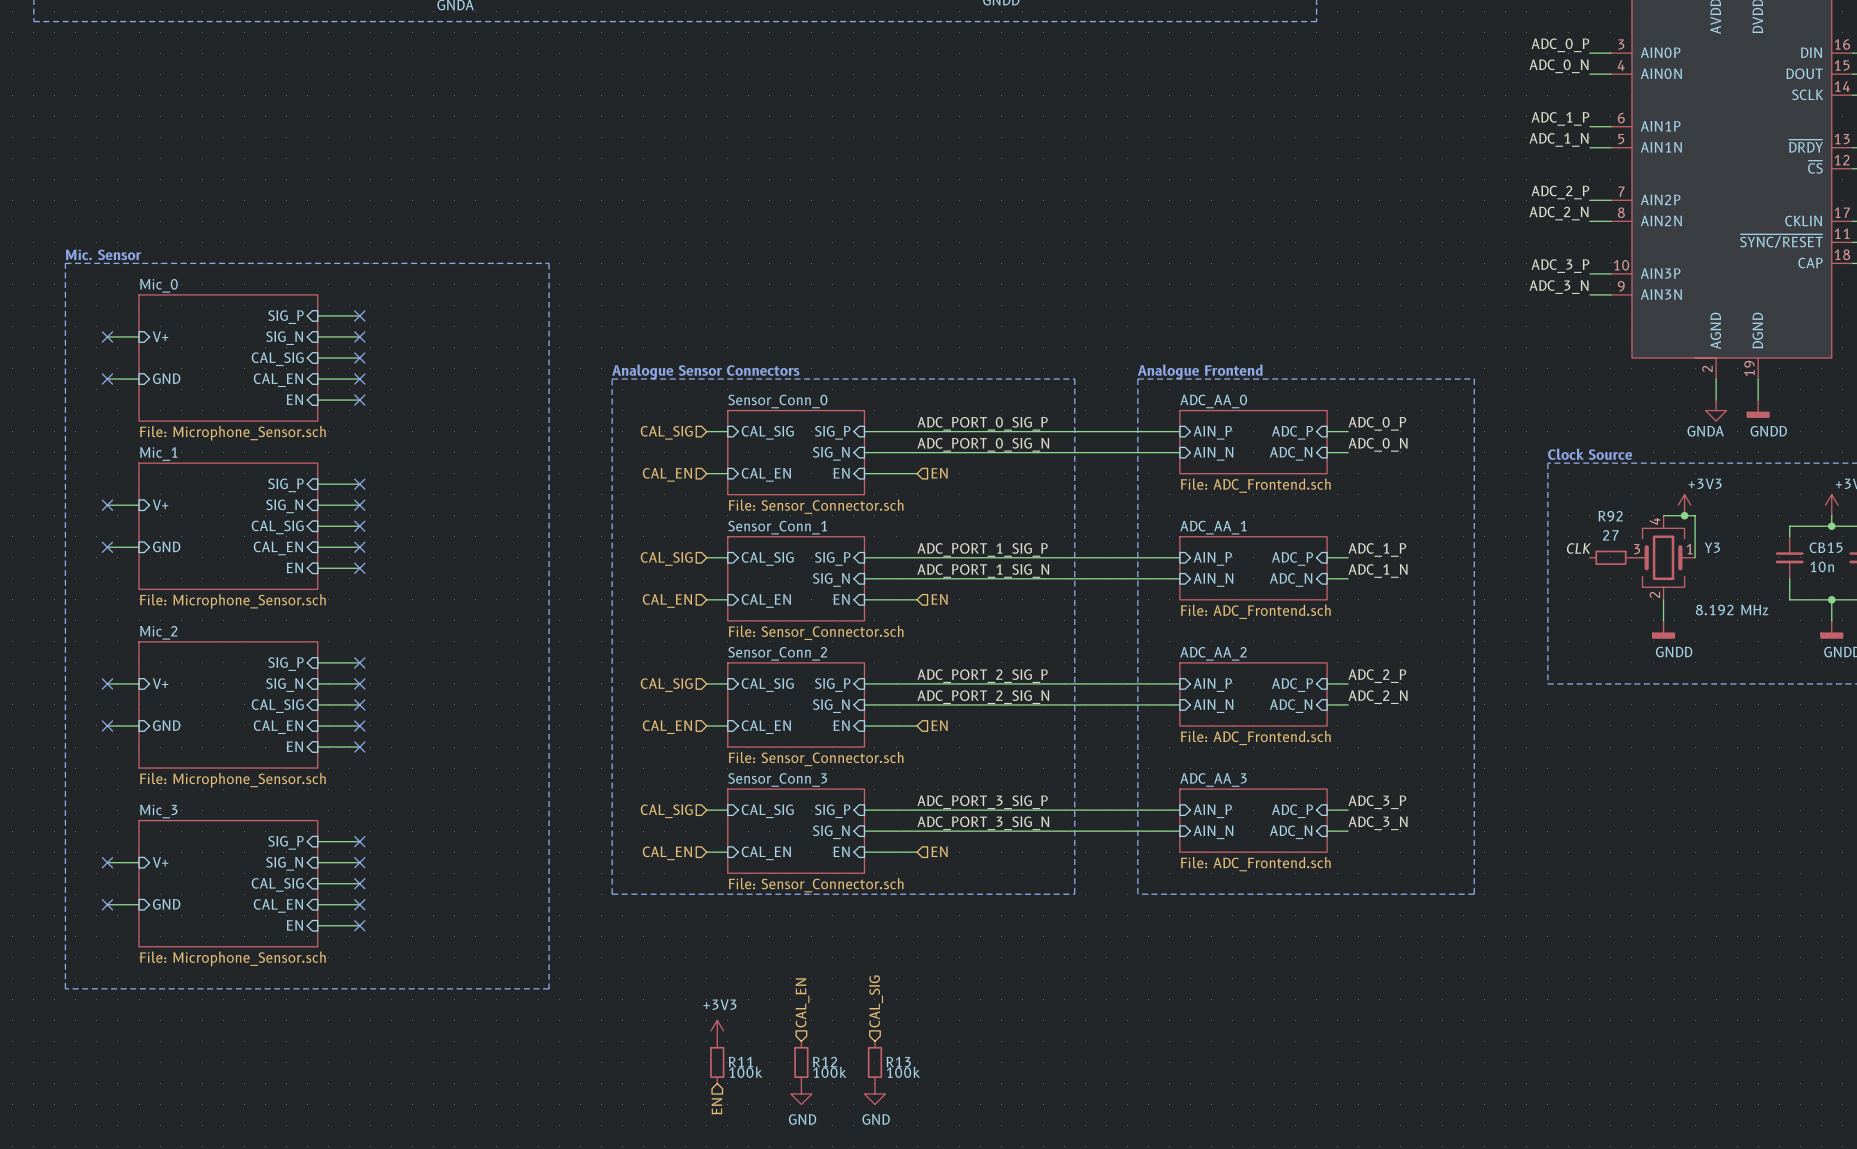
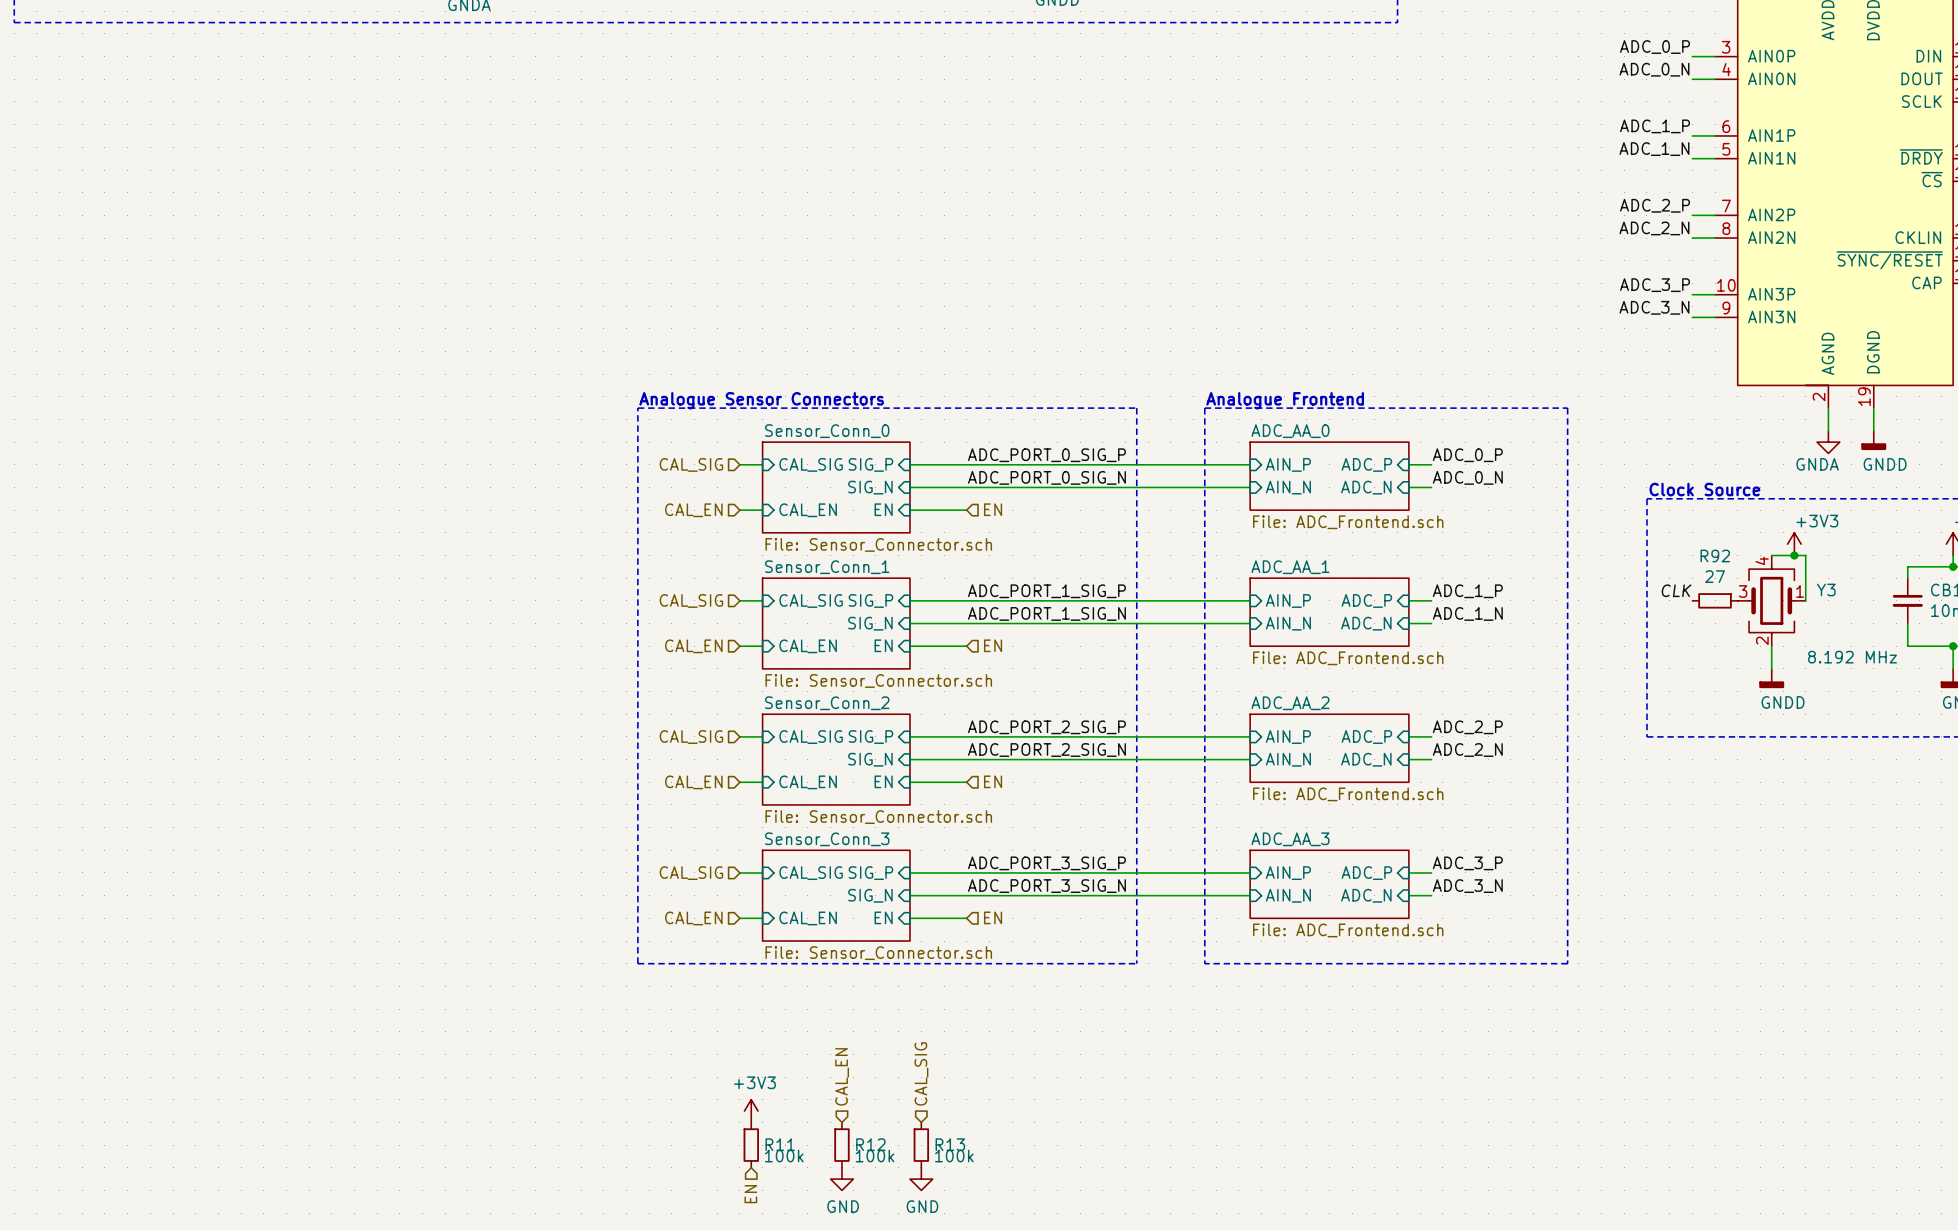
text: Mic. Sensor (103, 254) -> none
line: (65, 263) (65, 988) (549, 988) (549, 263) (65, 263) -> none
wire: (317, 315) (359, 315) -> none
no-connect mark: (359, 315) -> none
sheet pin: SIG_P (285, 317) -> none
wire: (107, 336) (139, 336) -> none
no-connect mark: (107, 336) -> none
sheet pin: V+ (160, 336) -> none
wire: (317, 336) (359, 336) -> none
no-connect mark: (359, 336) -> none
sheet pin: SIG_N (284, 338) -> none
sheet Mic_0: File: Microphone_Sensor.sch (228, 358) -> none
wire: (317, 358) (359, 358) -> none
no-connect mark: (359, 358) -> none
sheet pin: CAL_SIG (277, 359) -> none
sheet pin: GND (166, 378) -> none
wire: (107, 379) (139, 379) -> none
no-connect mark: (107, 379) -> none
wire: (317, 379) (359, 379) -> none
no-connect mark: (359, 379) -> none
sheet pin: CAL_EN (278, 380) -> none
sheet pin: EN (294, 399) -> none
wire: (317, 400) (359, 400) -> none
no-connect mark: (359, 400) -> none
wire: (317, 484) (359, 484) -> none
no-connect mark: (359, 484) -> none
sheet pin: SIG_P (285, 485) -> none
sheet pin: V+ (160, 504) -> none
wire: (107, 505) (139, 505) -> none
no-connect mark: (107, 505) -> none
wire: (317, 505) (359, 505) -> none
no-connect mark: (359, 505) -> none
sheet pin: SIG_N (284, 506) -> none
sheet Mic_1: File: Microphone_Sensor.sch (228, 526) -> none
wire: (317, 526) (359, 526) -> none
no-connect mark: (359, 526) -> none
sheet pin: CAL_SIG (277, 527) -> none
sheet pin: GND (166, 546) -> none
wire: (107, 547) (139, 547) -> none
no-connect mark: (107, 547) -> none
wire: (317, 547) (359, 547) -> none
no-connect mark: (359, 547) -> none
sheet pin: CAL_EN (278, 548) -> none
sheet pin: EN (294, 567) -> none
wire: (317, 568) (359, 568) -> none
no-connect mark: (359, 568) -> none
wire: (317, 662) (359, 662) -> none
no-connect mark: (359, 662) -> none
sheet pin: SIG_P (285, 664) -> none
wire: (107, 683) (139, 683) -> none
no-connect mark: (107, 683) -> none
sheet pin: V+ (160, 683) -> none
wire: (317, 683) (359, 683) -> none
no-connect mark: (359, 683) -> none
sheet pin: SIG_N (284, 685) -> none
sheet Mic_2: File: Microphone_Sensor.sch (228, 704) -> none
wire: (317, 704) (359, 704) -> none
no-connect mark: (359, 704) -> none
sheet pin: CAL_SIG (277, 706) -> none
wire: (107, 725) (139, 725) -> none
no-connect mark: (107, 725) -> none
sheet pin: GND (166, 725) -> none
wire: (317, 725) (359, 725) -> none
no-connect mark: (359, 725) -> none
sheet pin: CAL_EN (278, 727) -> none
sheet pin: EN (294, 746) -> none
wire: (317, 747) (359, 747) -> none
no-connect mark: (359, 747) -> none
wire: (317, 841) (359, 841) -> none
no-connect mark: (359, 841) -> none
sheet pin: SIG_P (285, 842) -> none
wire: (107, 862) (139, 862) -> none
no-connect mark: (107, 862) -> none
sheet pin: V+ (160, 862) -> none
wire: (317, 862) (359, 862) -> none
no-connect mark: (359, 862) -> none
sheet pin: SIG_N (284, 863) -> none
sheet Mic_3: File: Microphone_Sensor.sch (228, 883) -> none
wire: (317, 883) (359, 883) -> none
no-connect mark: (359, 883) -> none
sheet pin: CAL_SIG (277, 884) -> none
wire: (107, 904) (139, 904) -> none
no-connect mark: (107, 904) -> none
sheet pin: GND (166, 904) -> none
wire: (317, 904) (359, 904) -> none
no-connect mark: (359, 904) -> none
sheet pin: CAL_EN (278, 905) -> none
sheet pin: EN (294, 925) -> none
wire: (317, 925) (359, 925) -> none
no-connect mark: (359, 925) -> none

